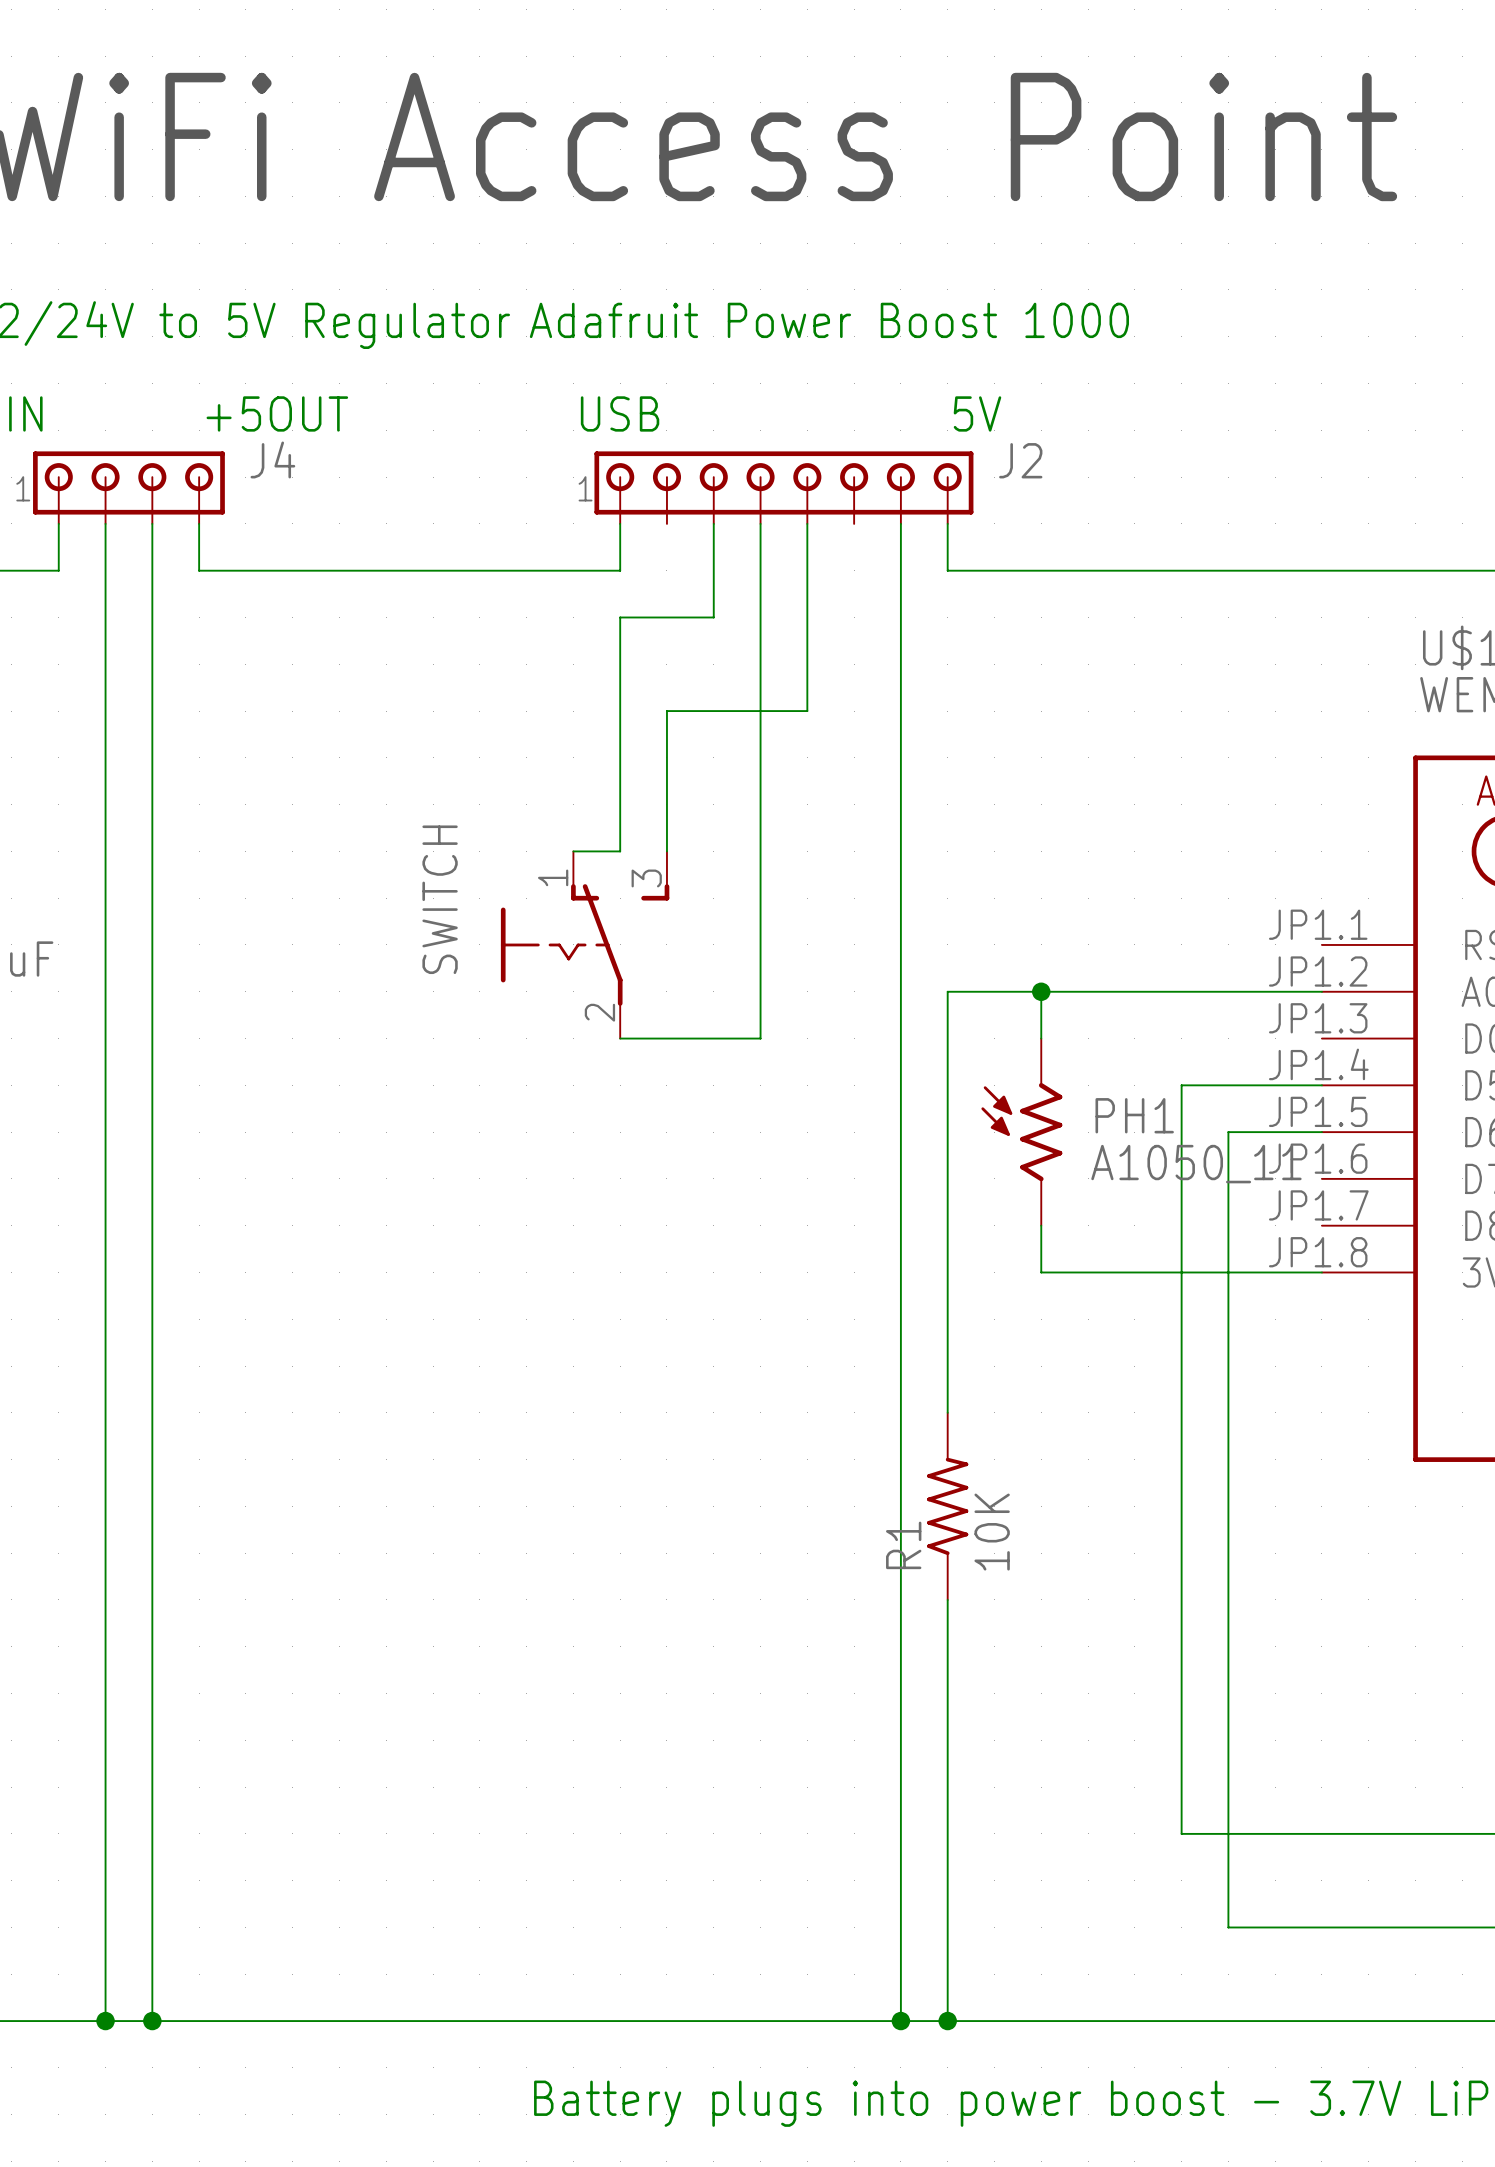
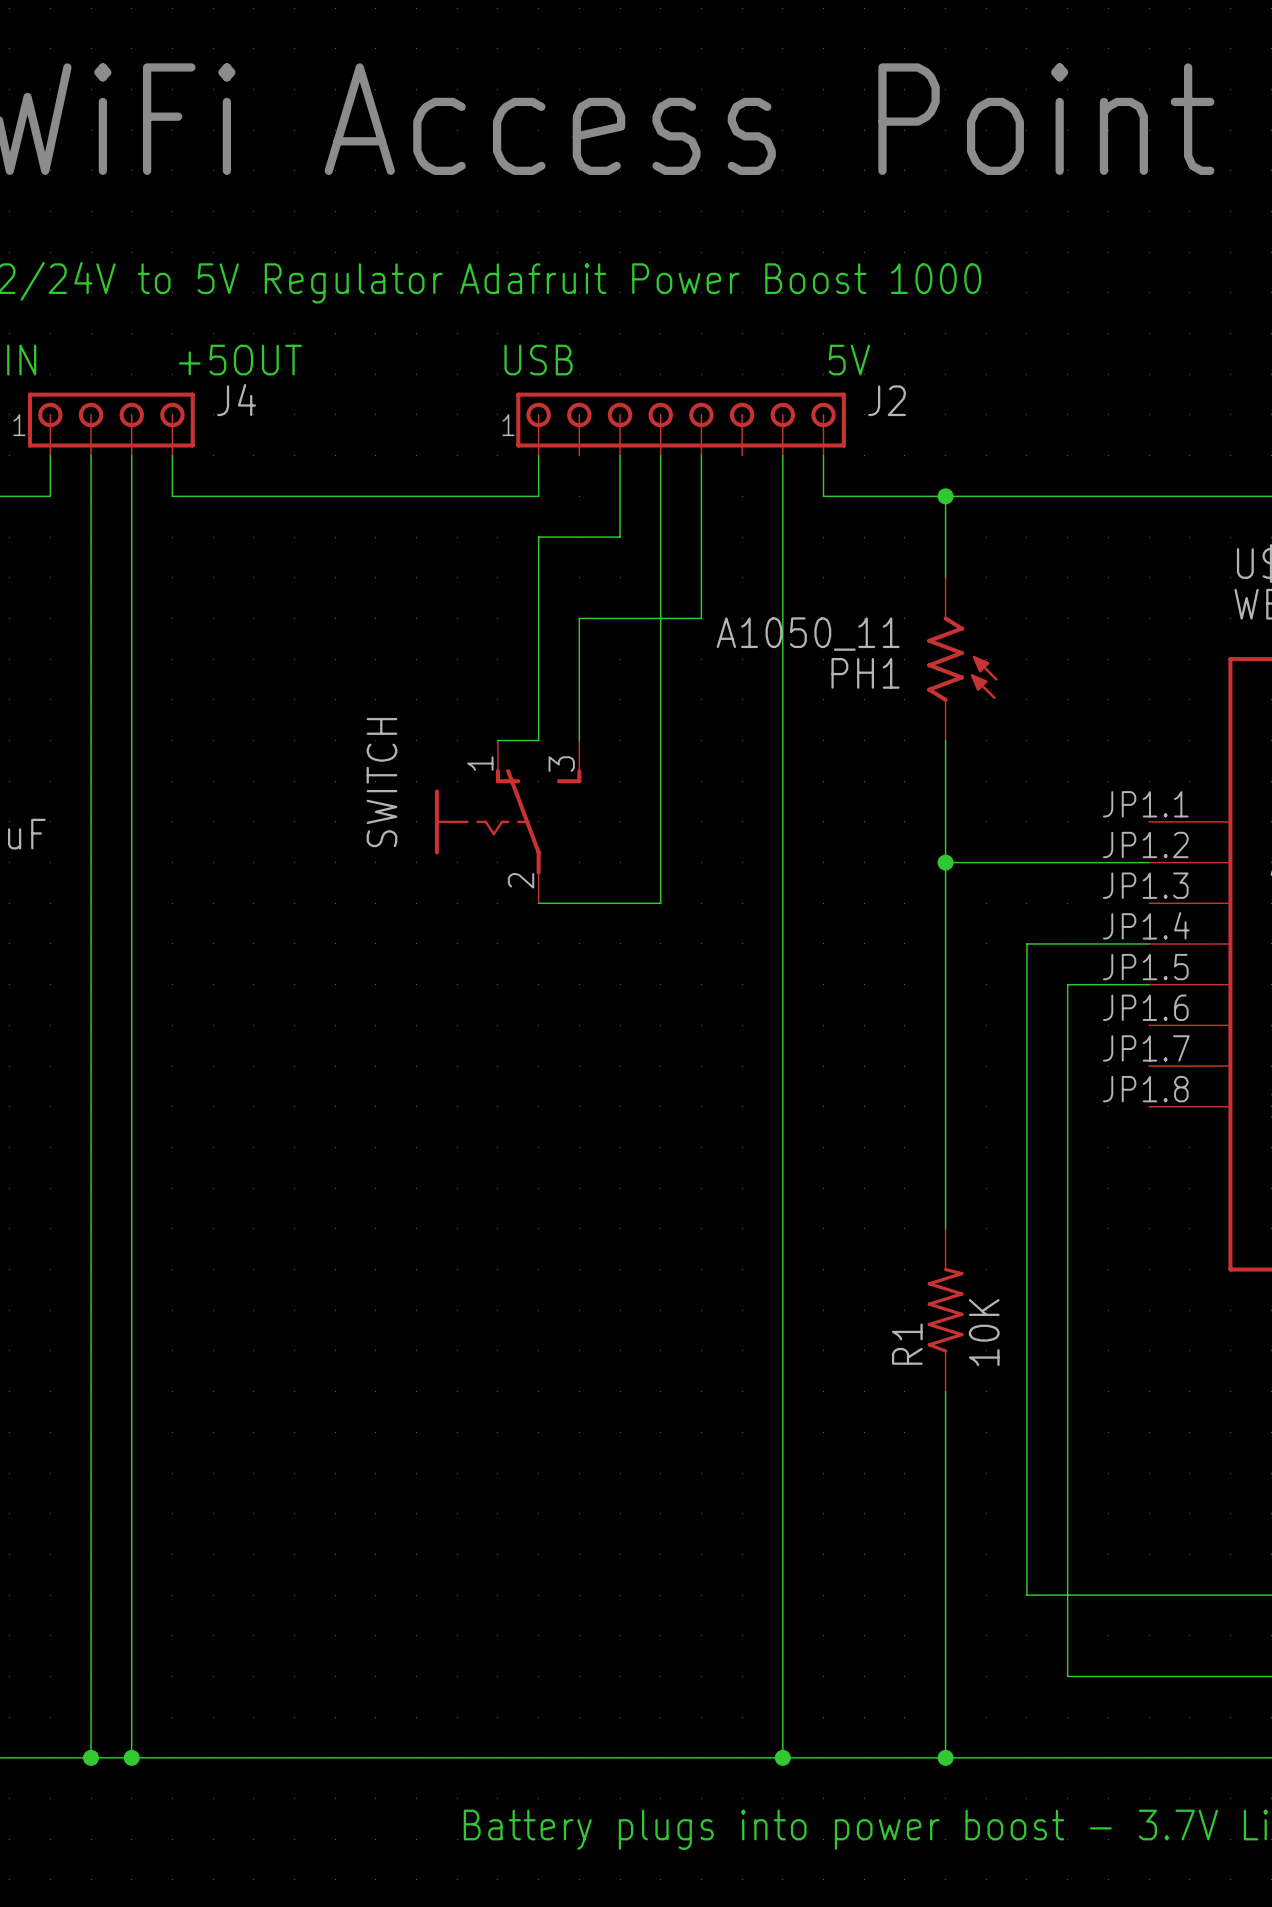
wire: none -> (945, 496) (945, 577)
junction: none -> (945, 496)
wire: none -> (945, 740) (945, 1228)
wire: (1041, 991) (1041, 1038) -> none
junction position: (1041, 991) -> (945, 862)
wire: (1088, 991) (947, 991) (947, 1412) -> none
PH1 rotation: 0° (1021, 1132) -> 180° (962, 659)
PH1 position: (1021, 1132) -> (962, 659)
wire: (1041, 1225) (1041, 1272) (1321, 1272) -> none
R1 position: (947, 1506) -> (945, 1310)
wire: (947, 1599) (947, 2021) -> (945, 1391) (945, 1757)
junction: (947, 2021) -> none
junction: none -> (945, 1757)

